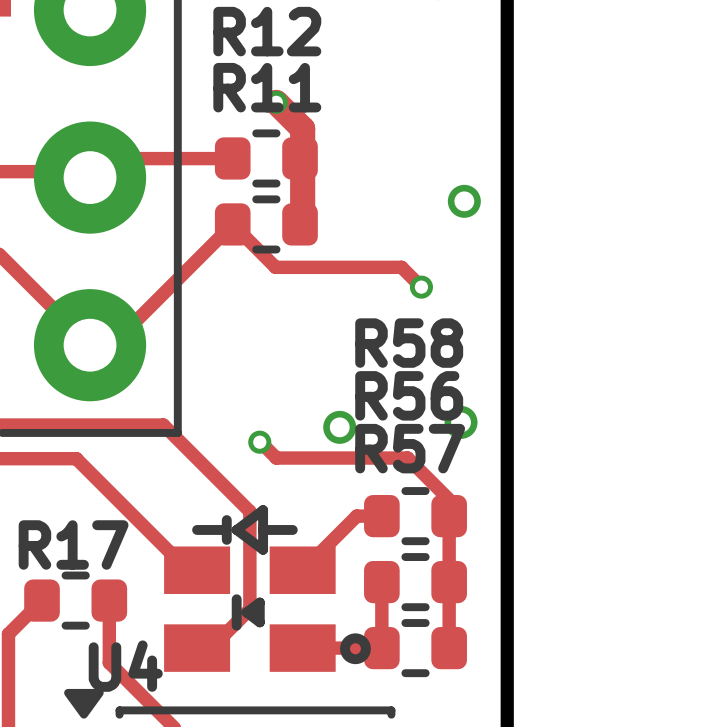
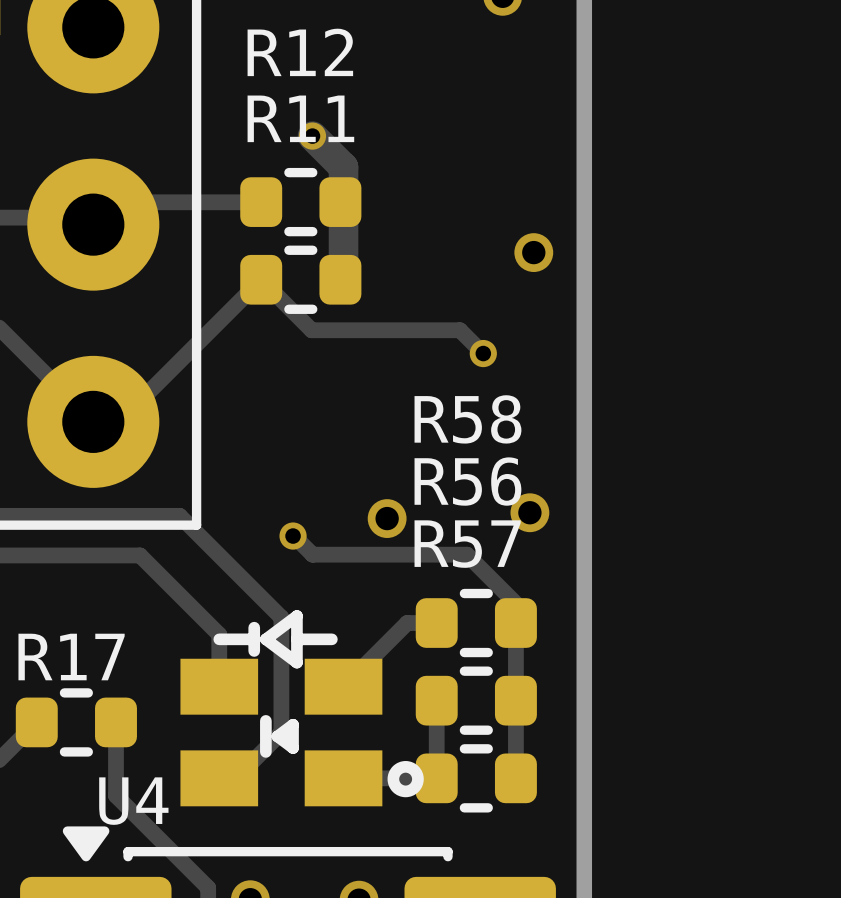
track: (76, 458) (187, 570) (197, 570) -> (77, 555) (140, 555) (219, 634) (219, 686)

